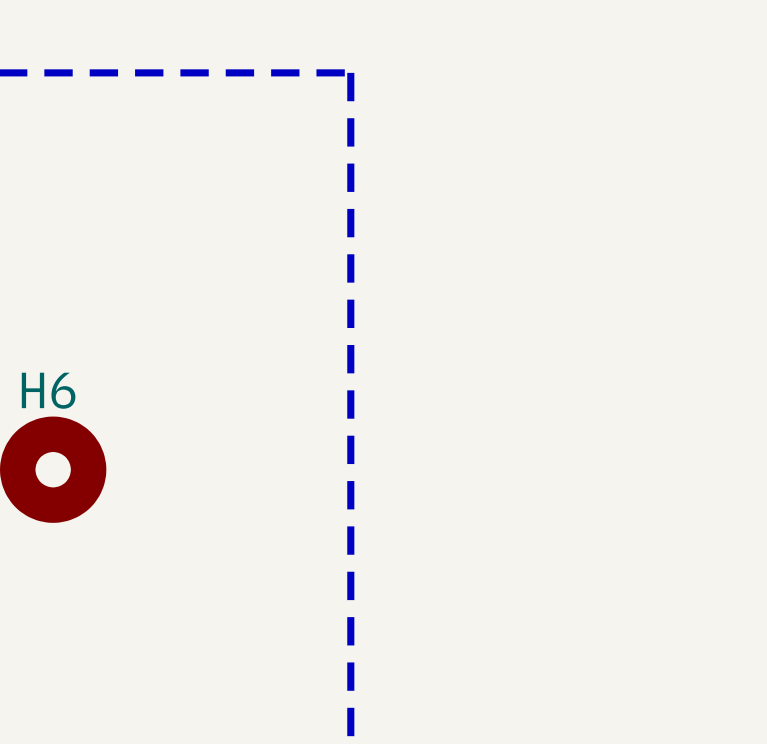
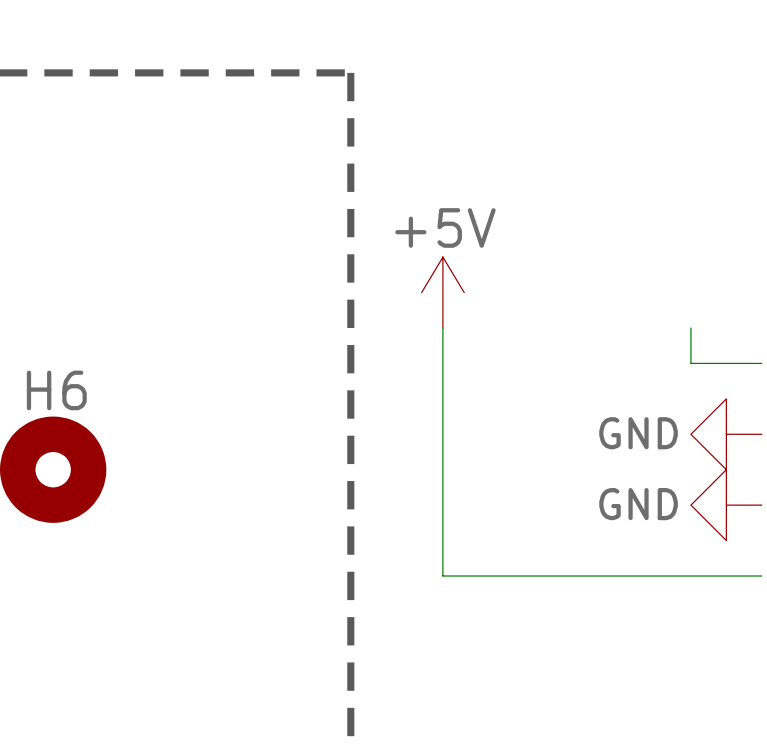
power symbol: none -> +5V (442, 292)
wire: none -> (442, 327) (442, 576) (761, 576)
wire: none -> (690, 327) (690, 363) (761, 363)
power symbol: none -> GND (726, 434)
power symbol: none -> GND (726, 505)

